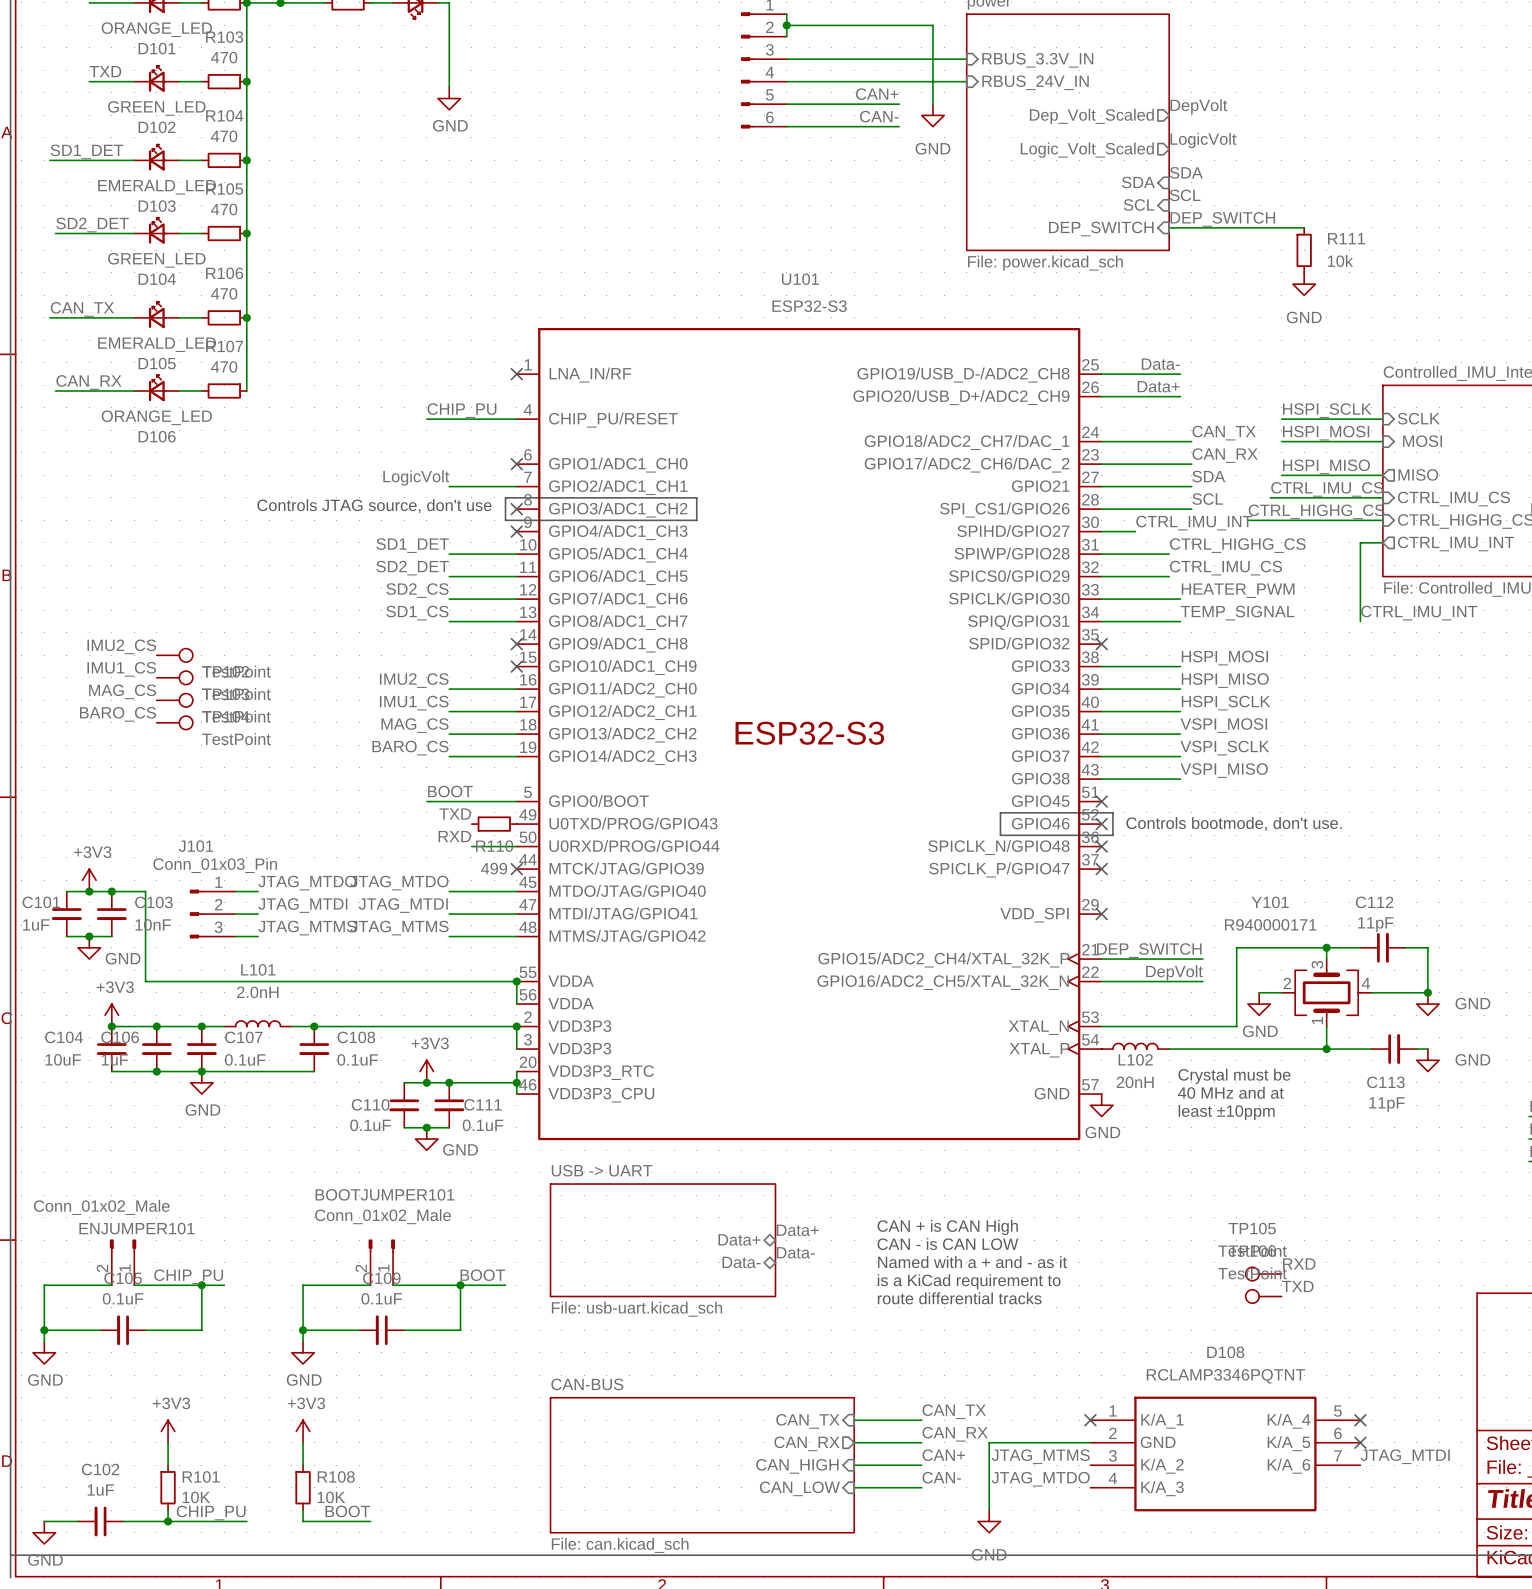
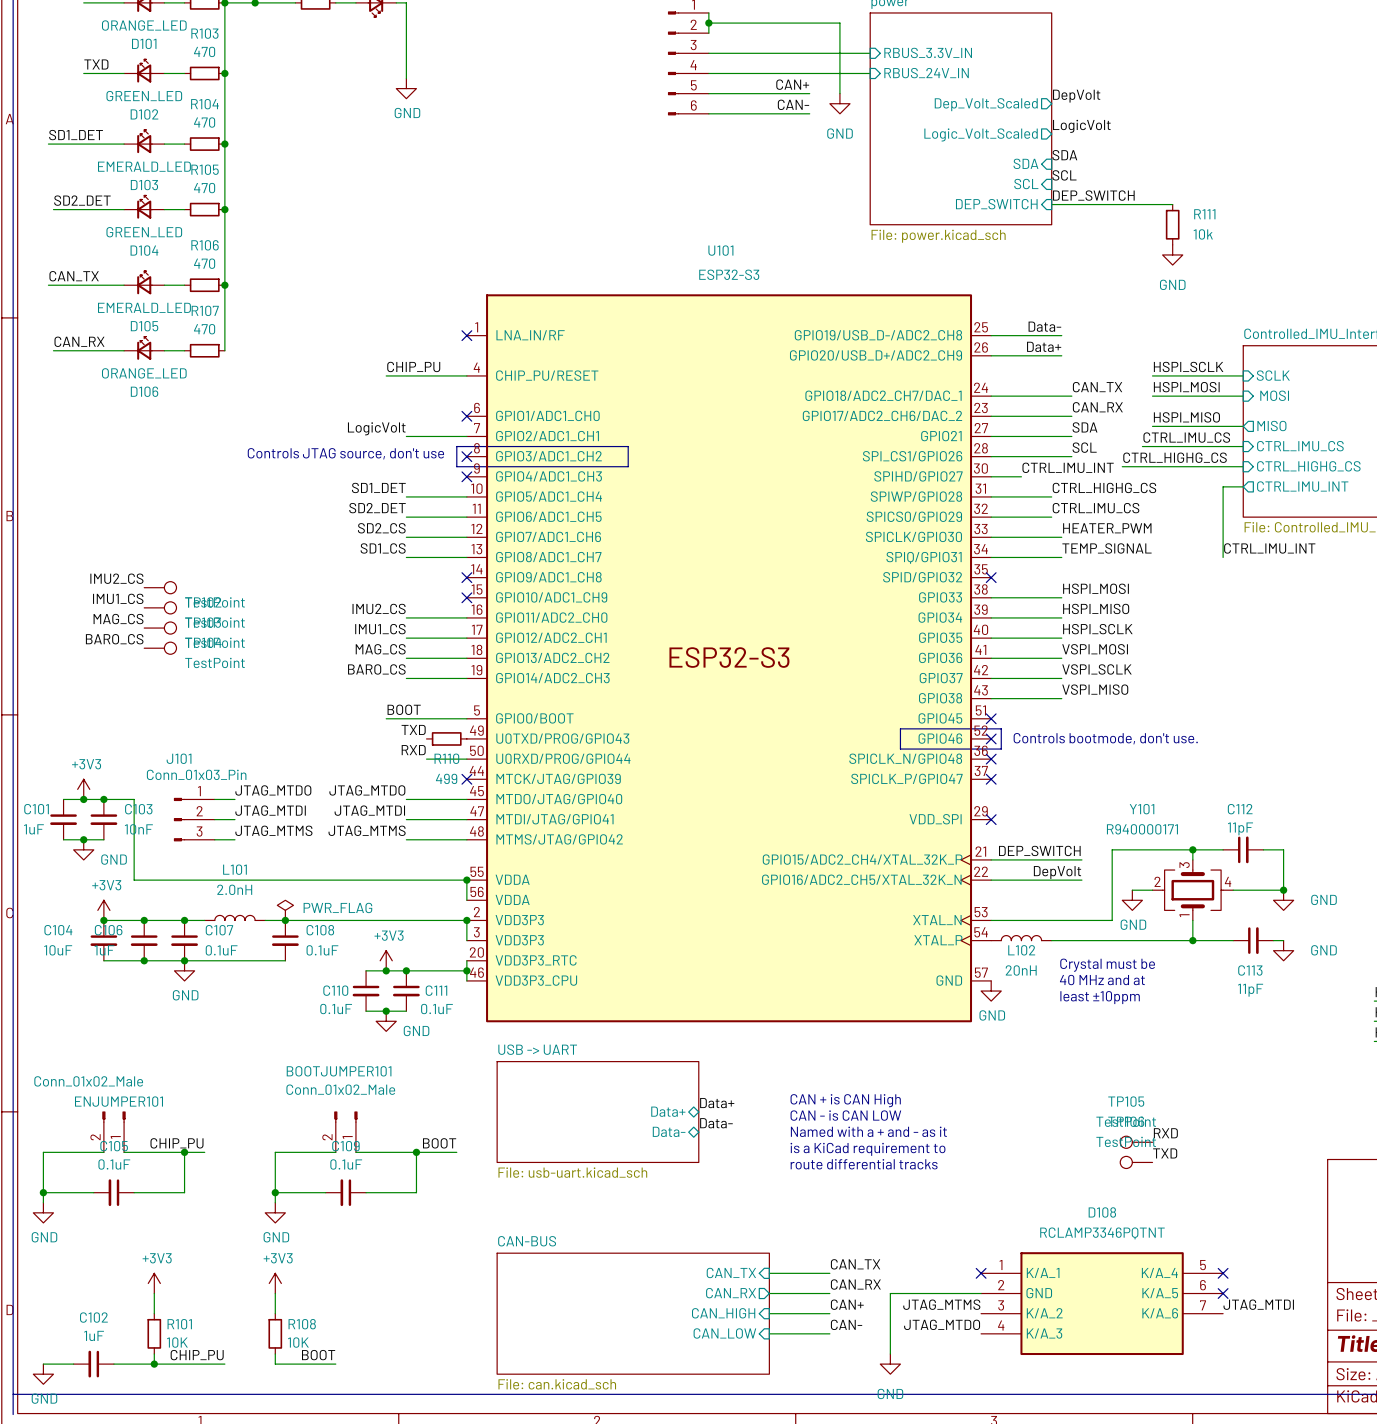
power symbol: none -> PWR_FLAG (285, 910)

